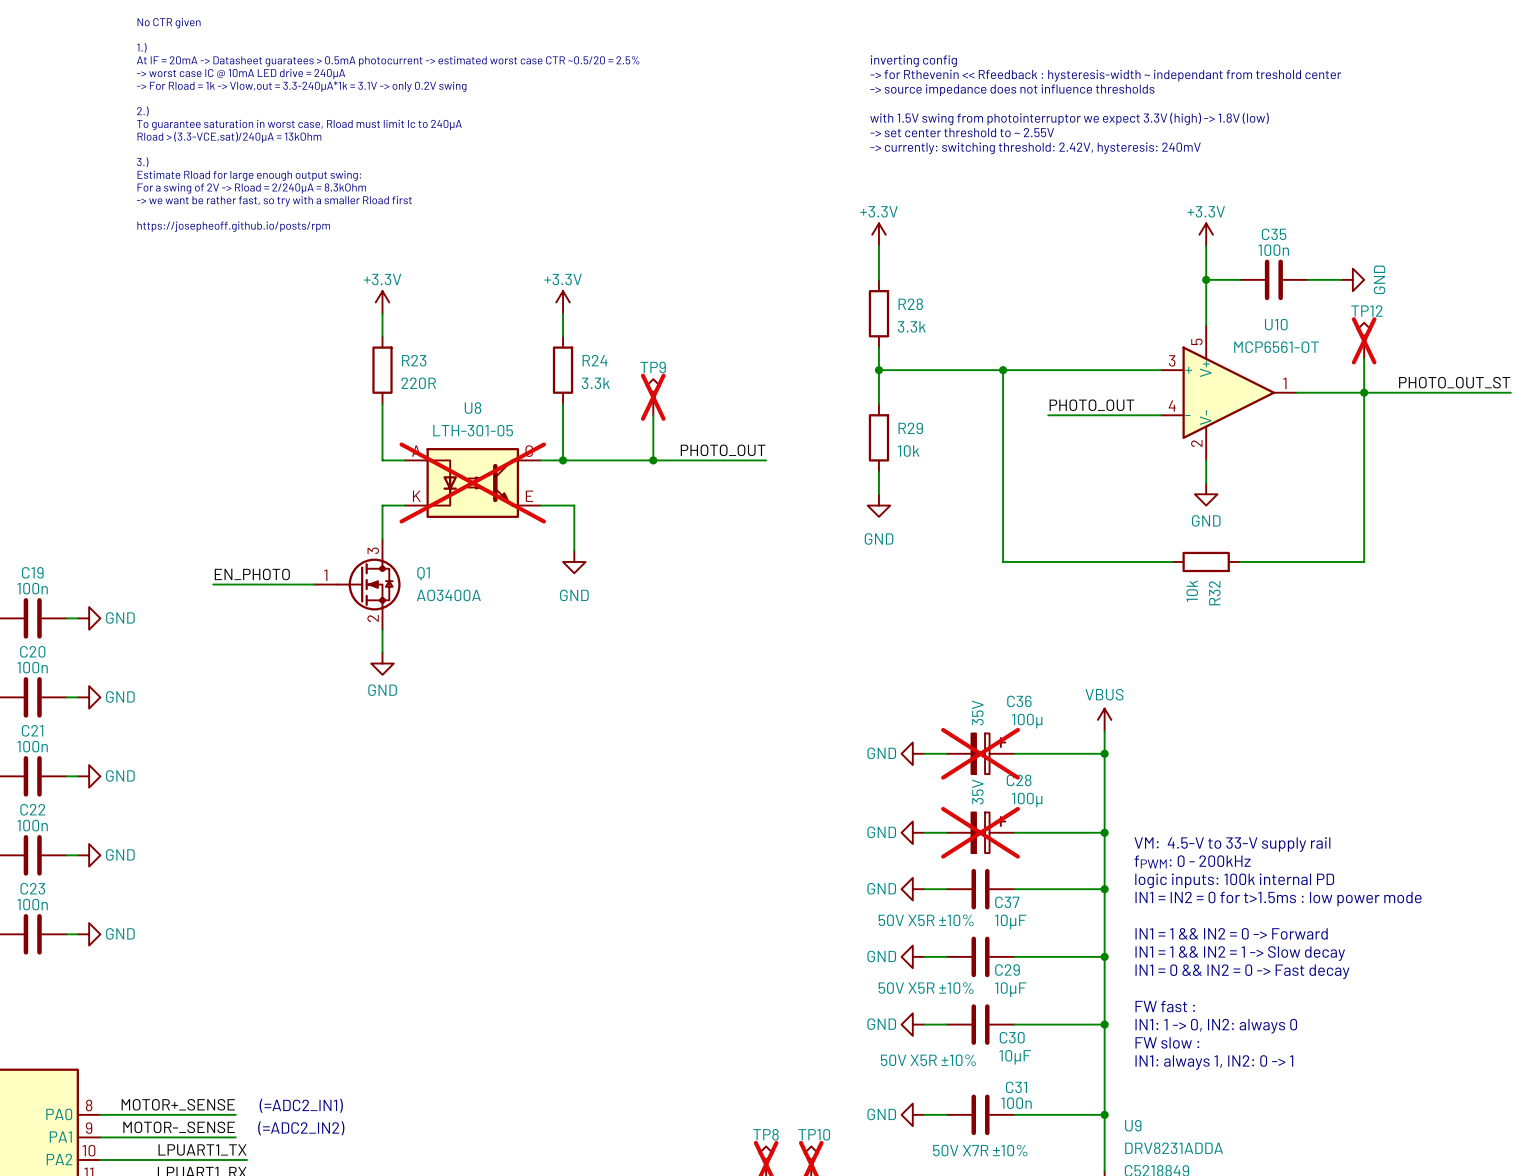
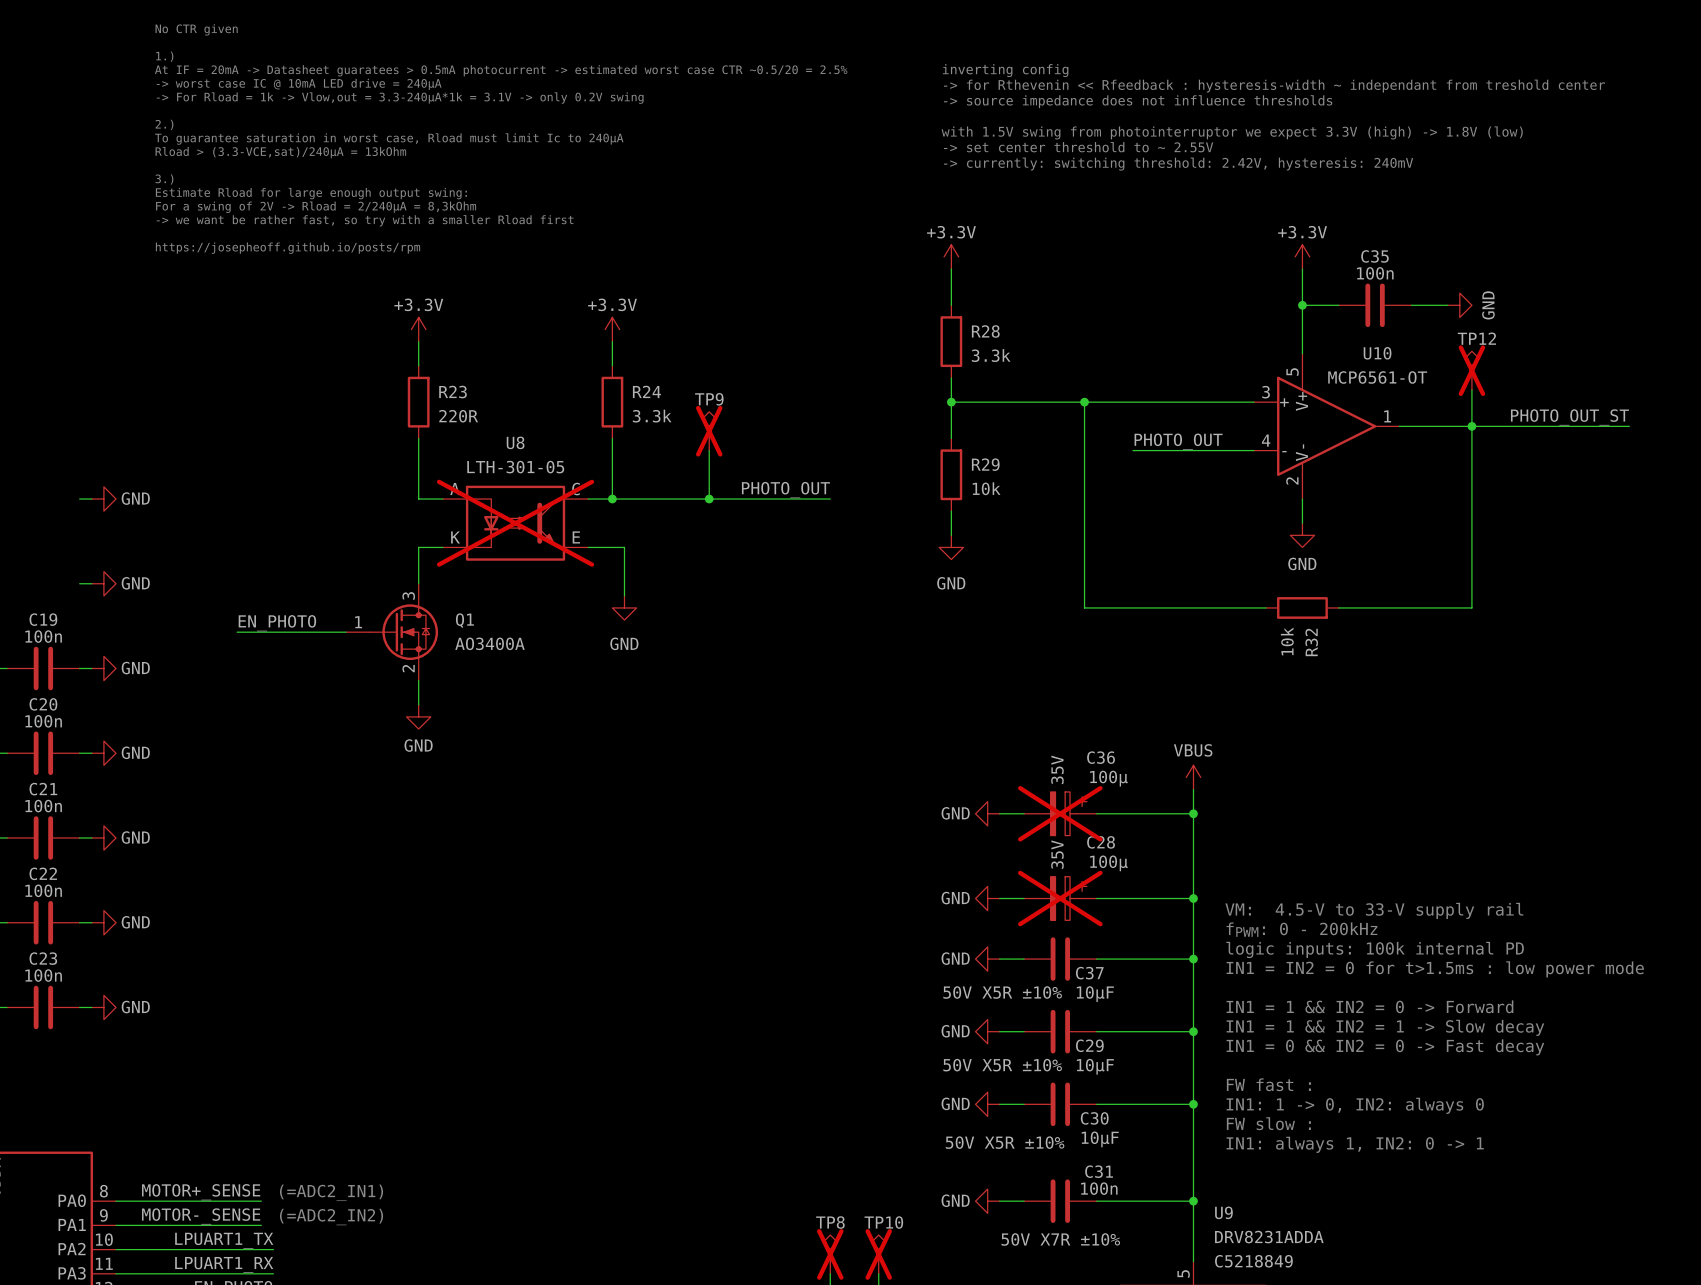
wire: none -> (79, 499) (91, 499)
power symbol: none -> GND (103, 499)
wire: none -> (79, 583) (91, 583)
power symbol: none -> GND (103, 583)

